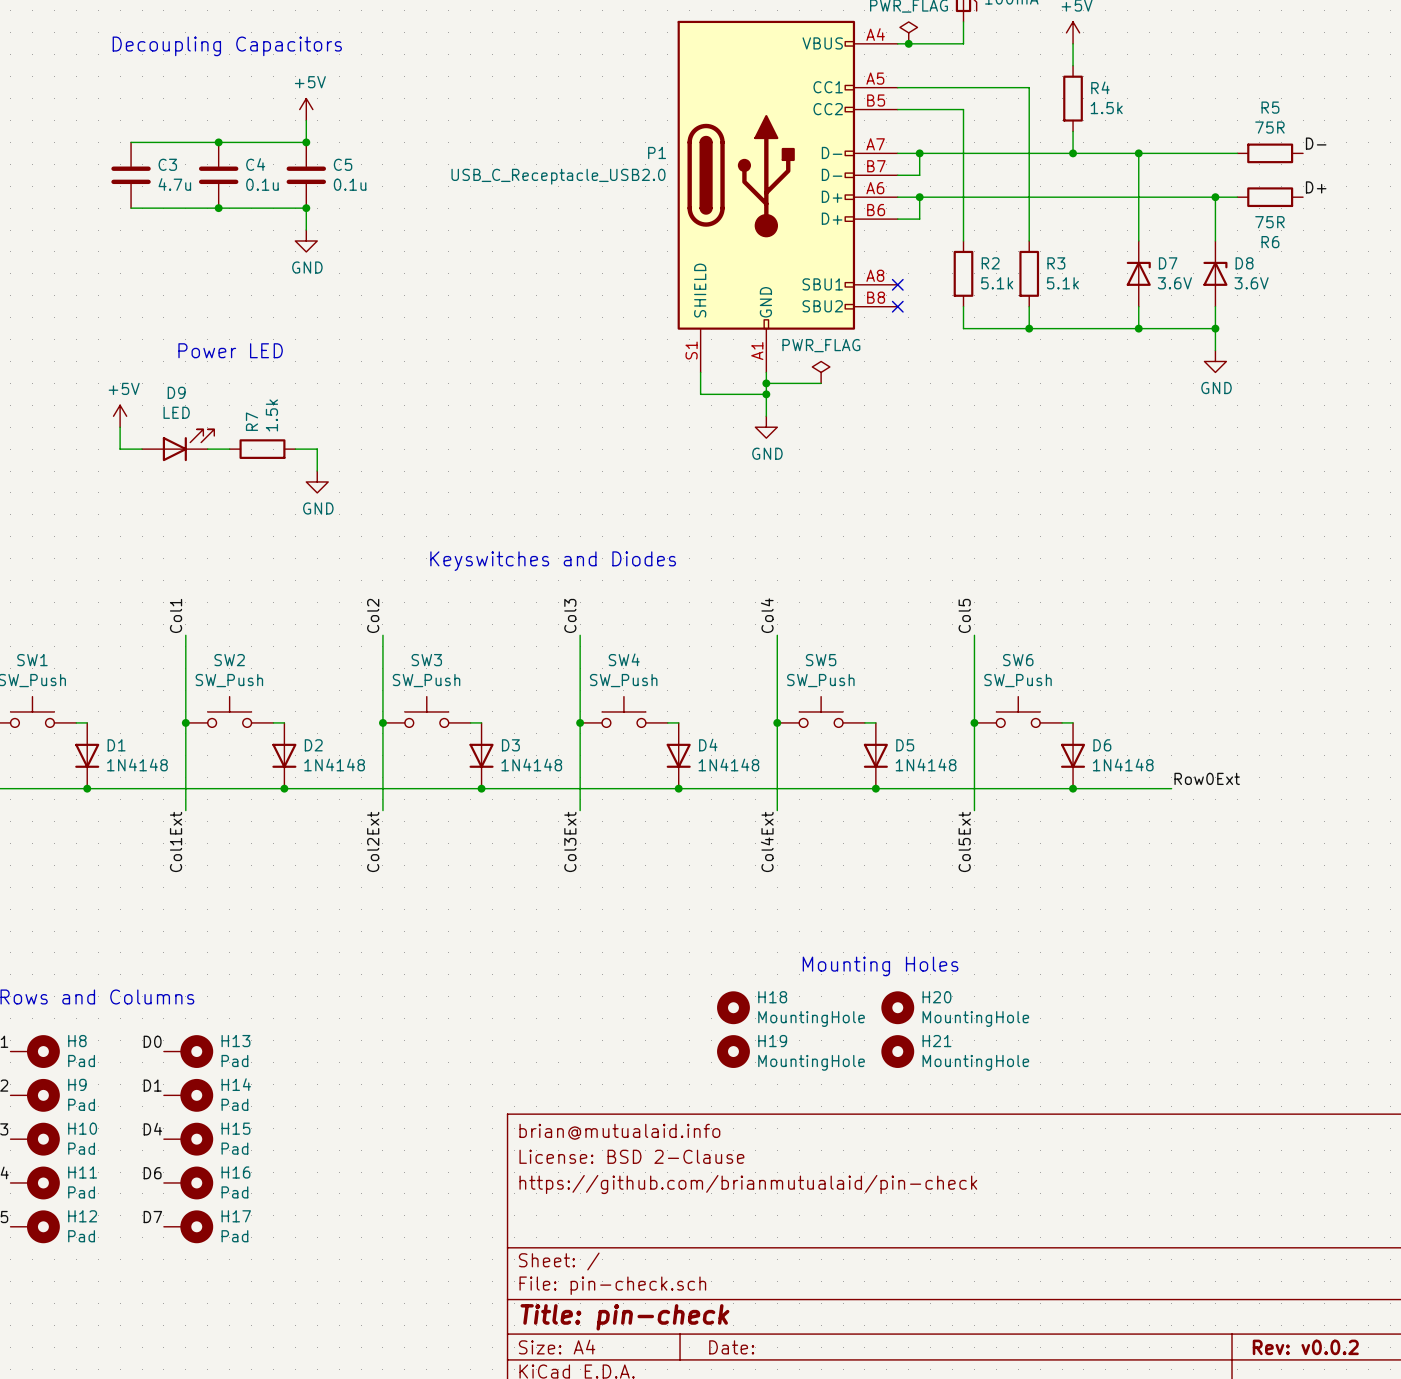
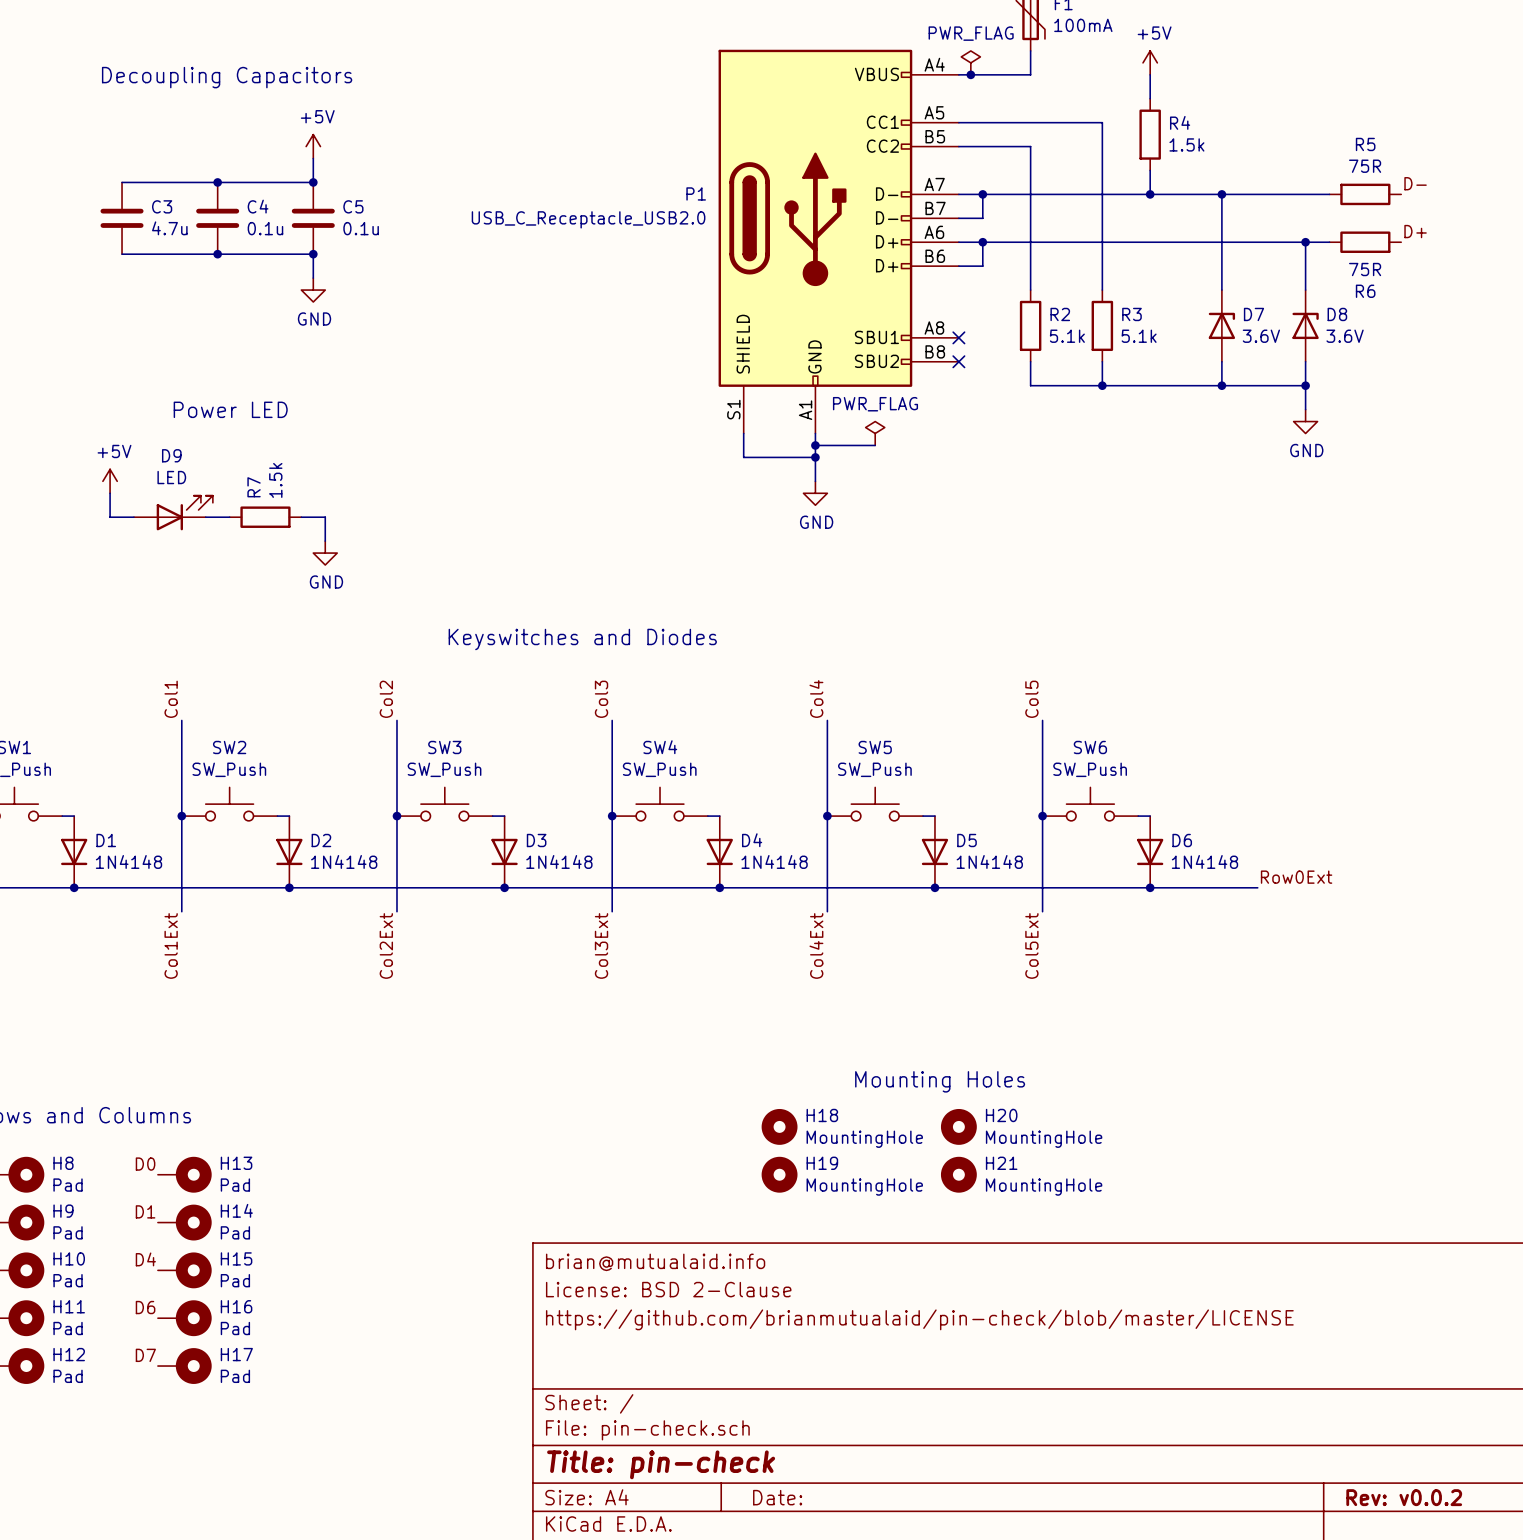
title block: https://github.com/brianmutualaid/pin-check (748, 1184) -> https://github.com/brianmutualaid/pin-check/blob/master/LICENSE (919, 1319)

